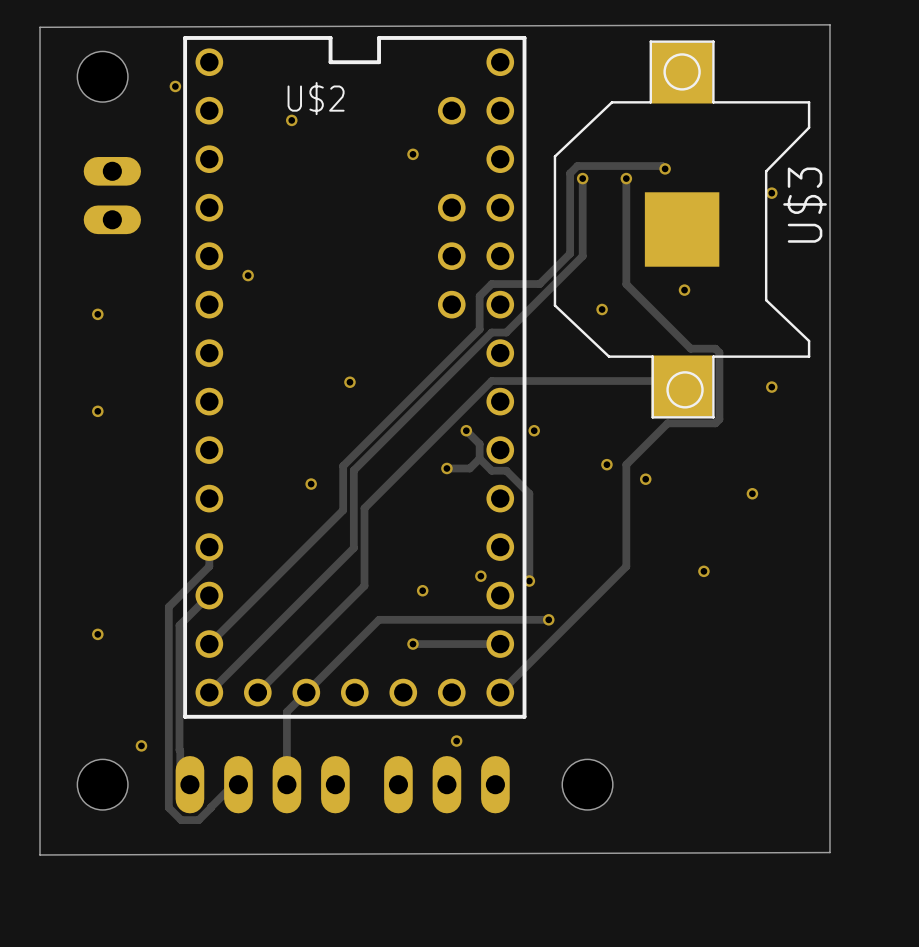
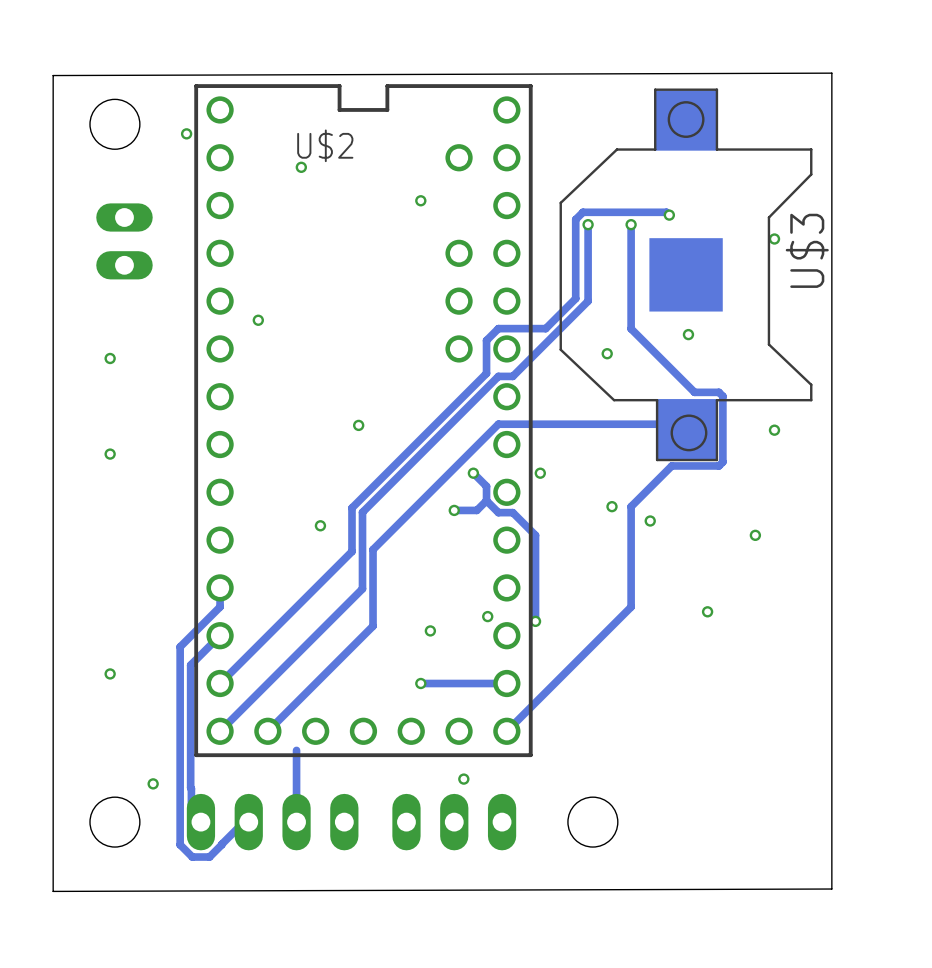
track: (548, 619) (379, 619) (286, 711) -> none
via: (548, 619) -> none

